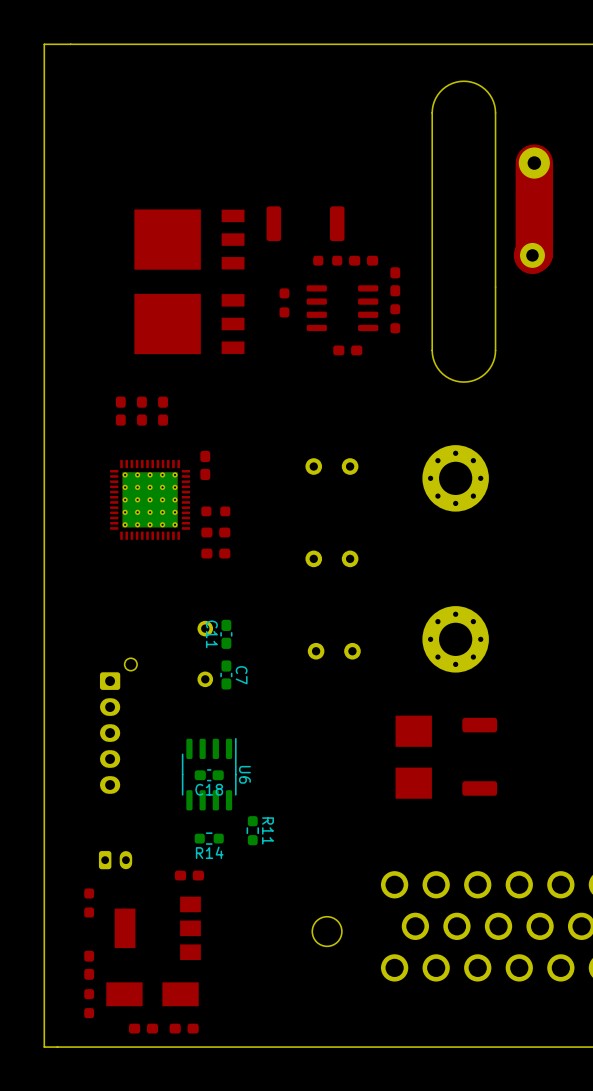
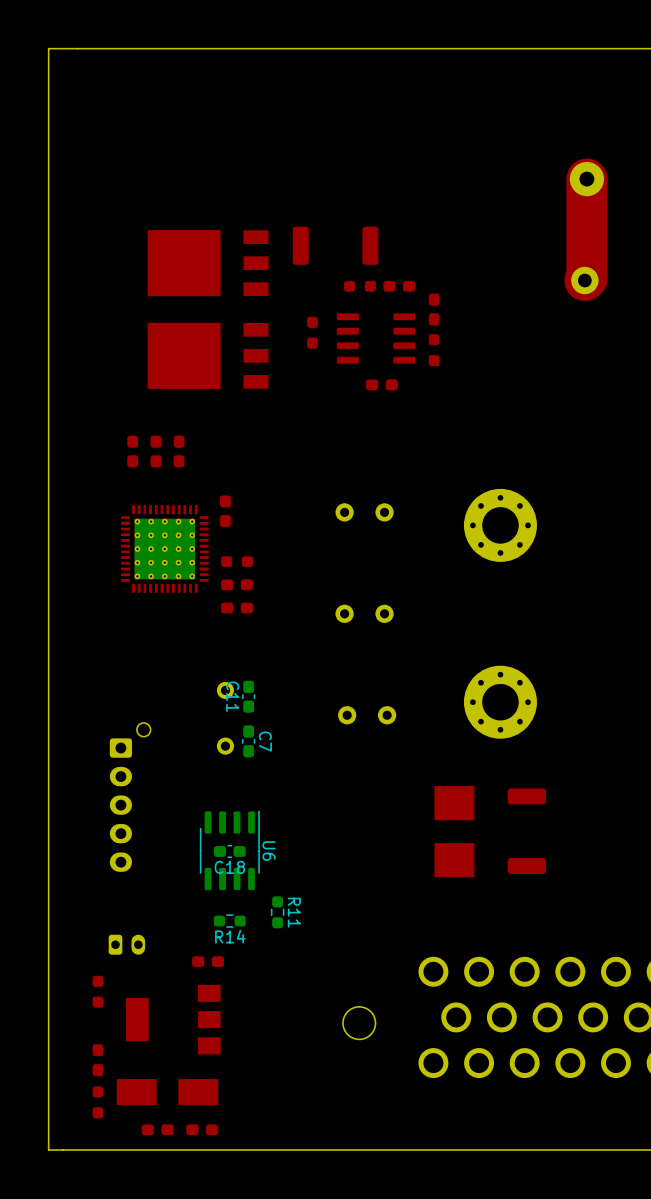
board edge: (495, 112) (495, 354) (491, 365) (484, 374) (471, 381) (460, 381) (442, 374) (435, 365) (432, 354) (432, 109) (435, 98) (442, 89) (452, 83) (463, 81) (478, 84) (487, 91) (493, 101) (495, 112) -> none

